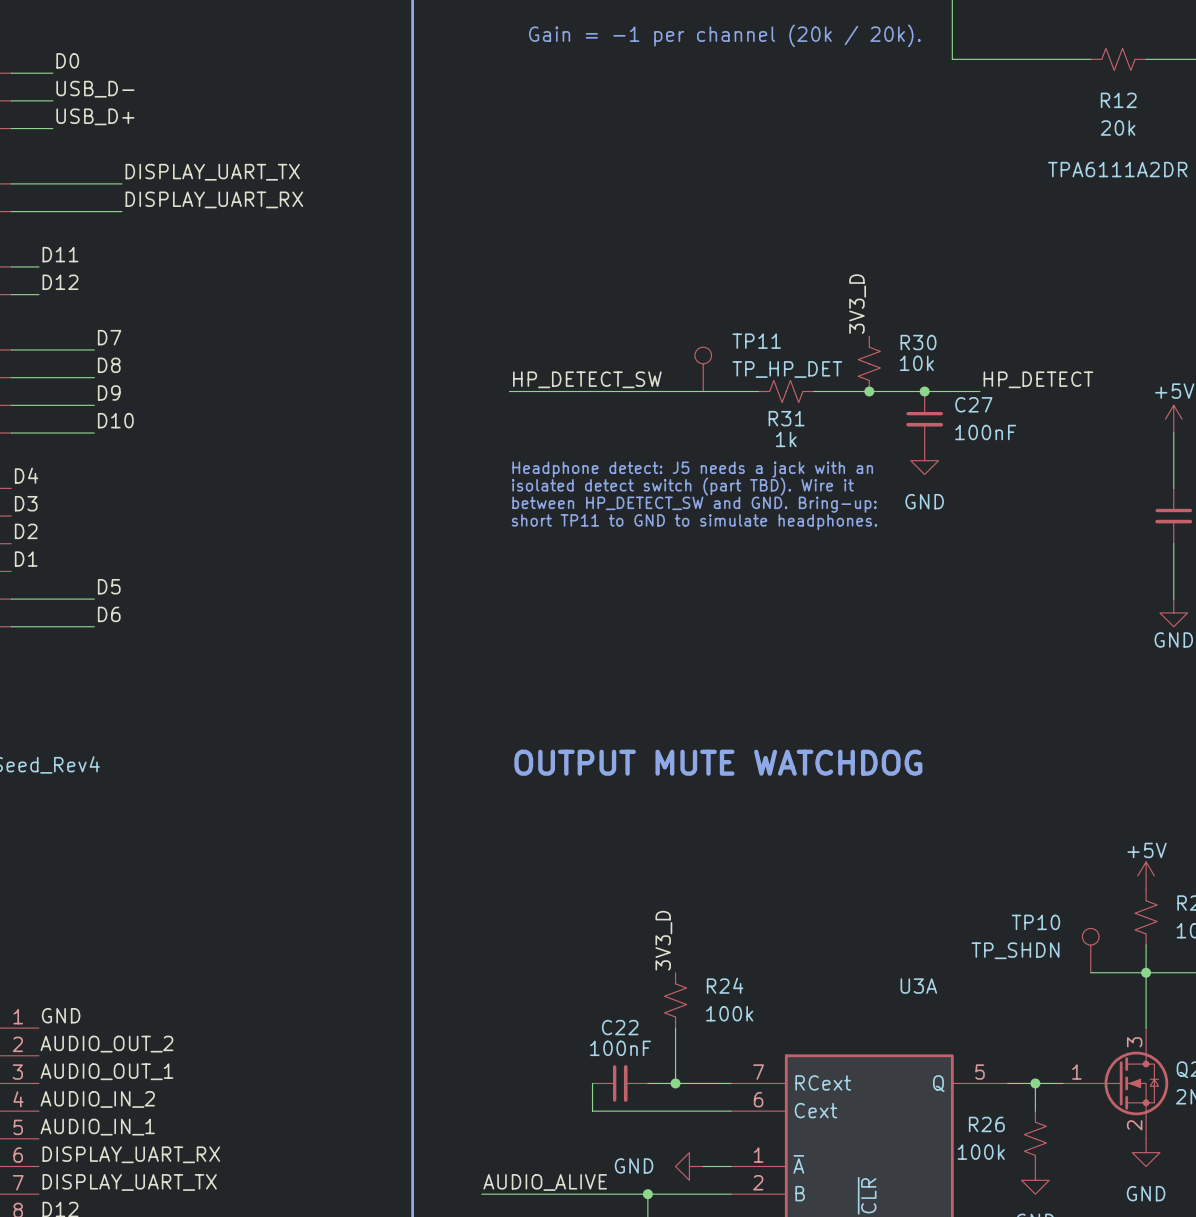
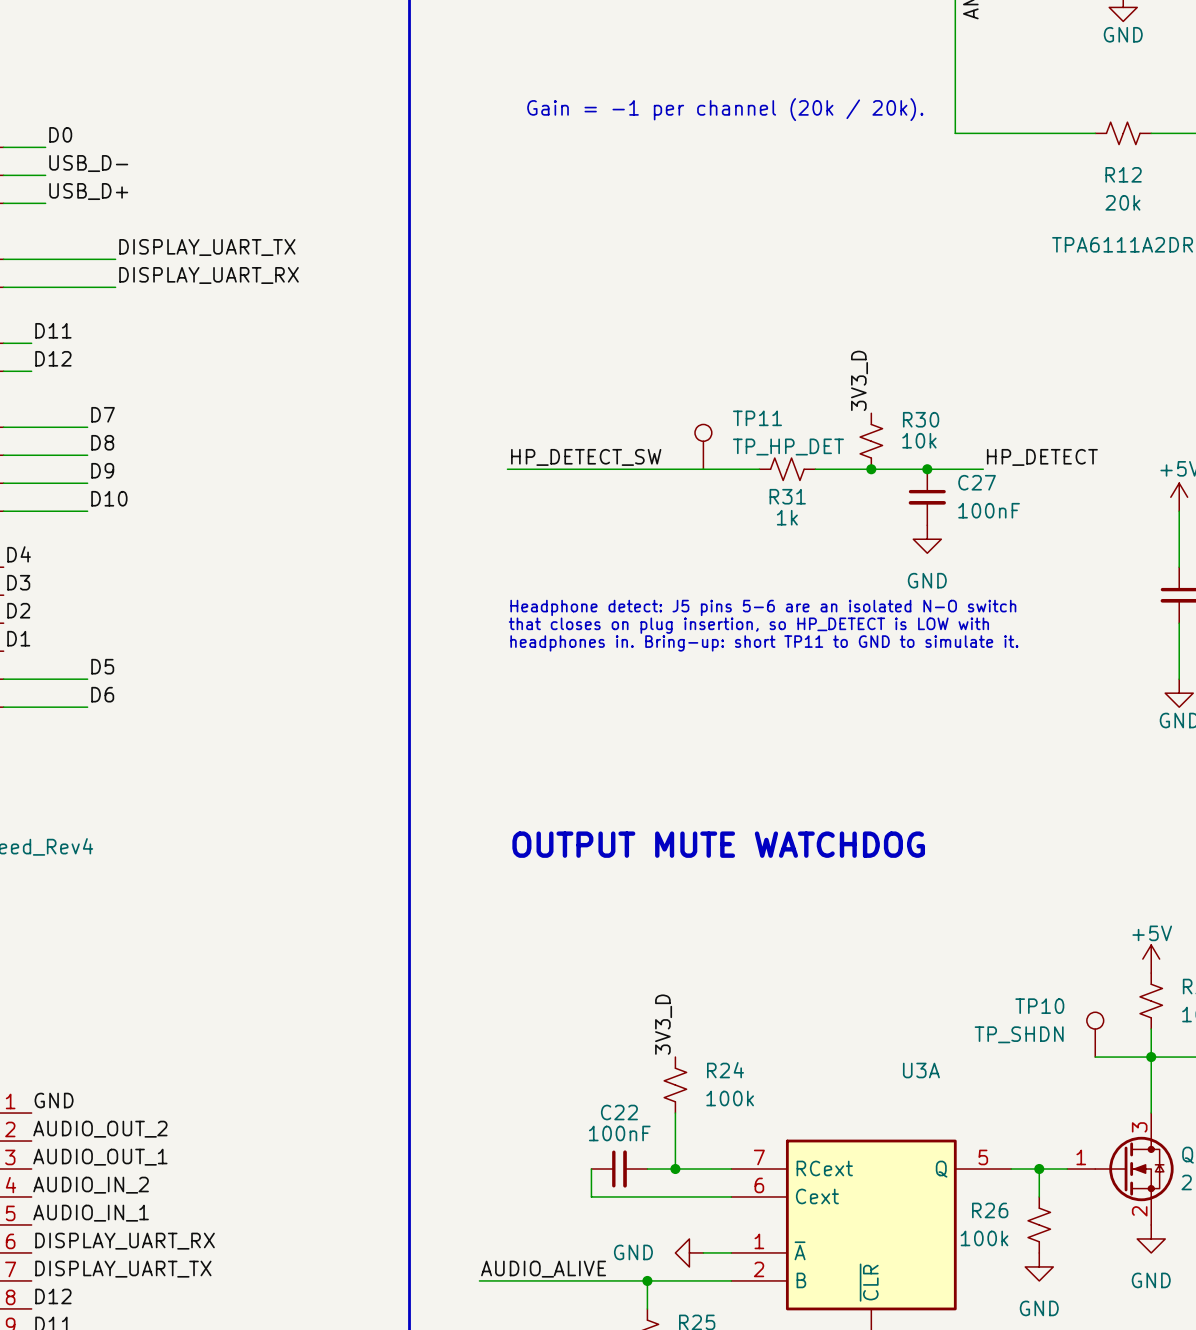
text: Headphone detect: J5 needs a jack with an (692, 469) -> none
text: isolated detect switch (part TBD). Wire it (682, 486) -> none
text: between HP_DETECT_SW and GND. Bring-up: (694, 504) -> none
text: short TP11 to GND to simulate headphones. (694, 522) -> Headphone detect: J5 pins 5-6 are an isolated N-O switch (763, 607)
text: none -> that closes on plug insertion, so HP_DETECT is LOW with (748, 625)
text: none -> headphones in. Bring-up: short TP11 to GND to simulate it. (764, 643)

